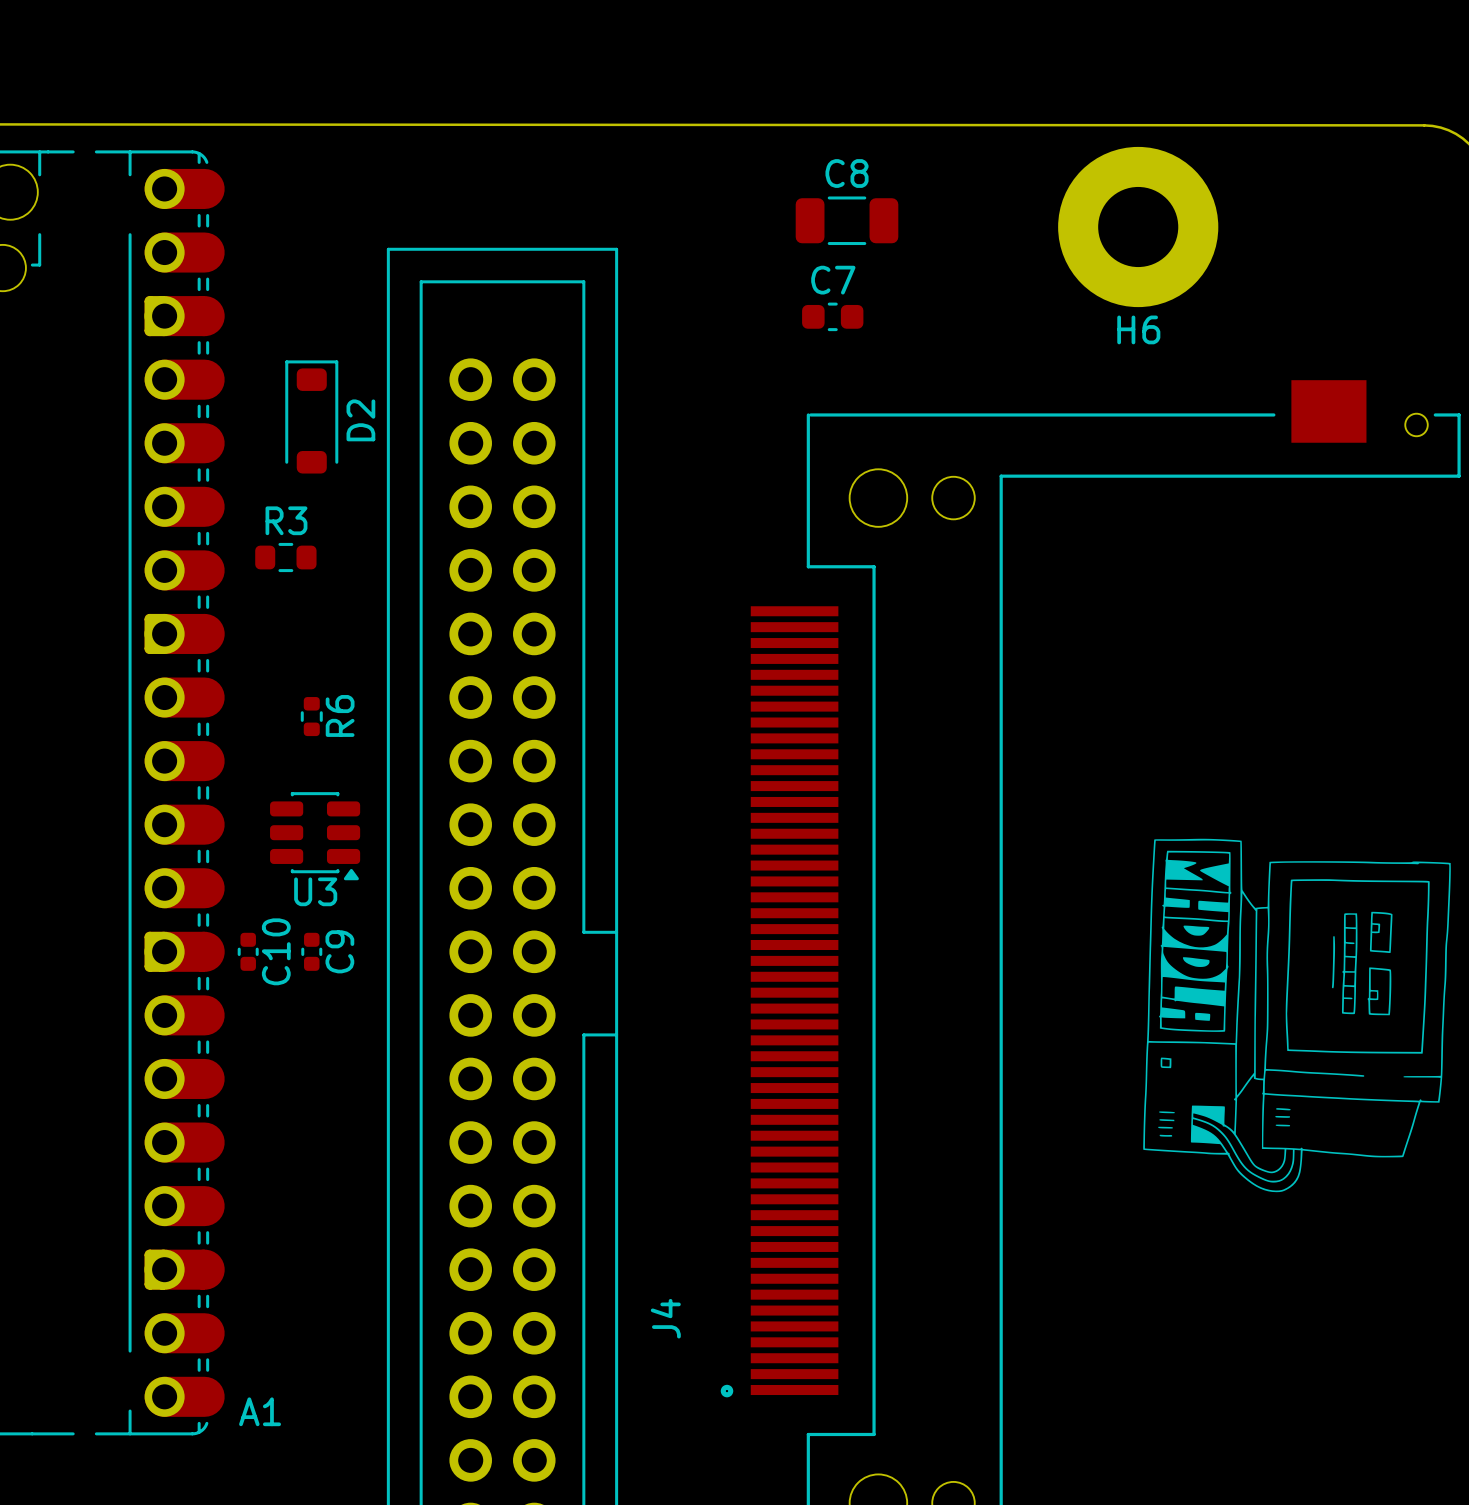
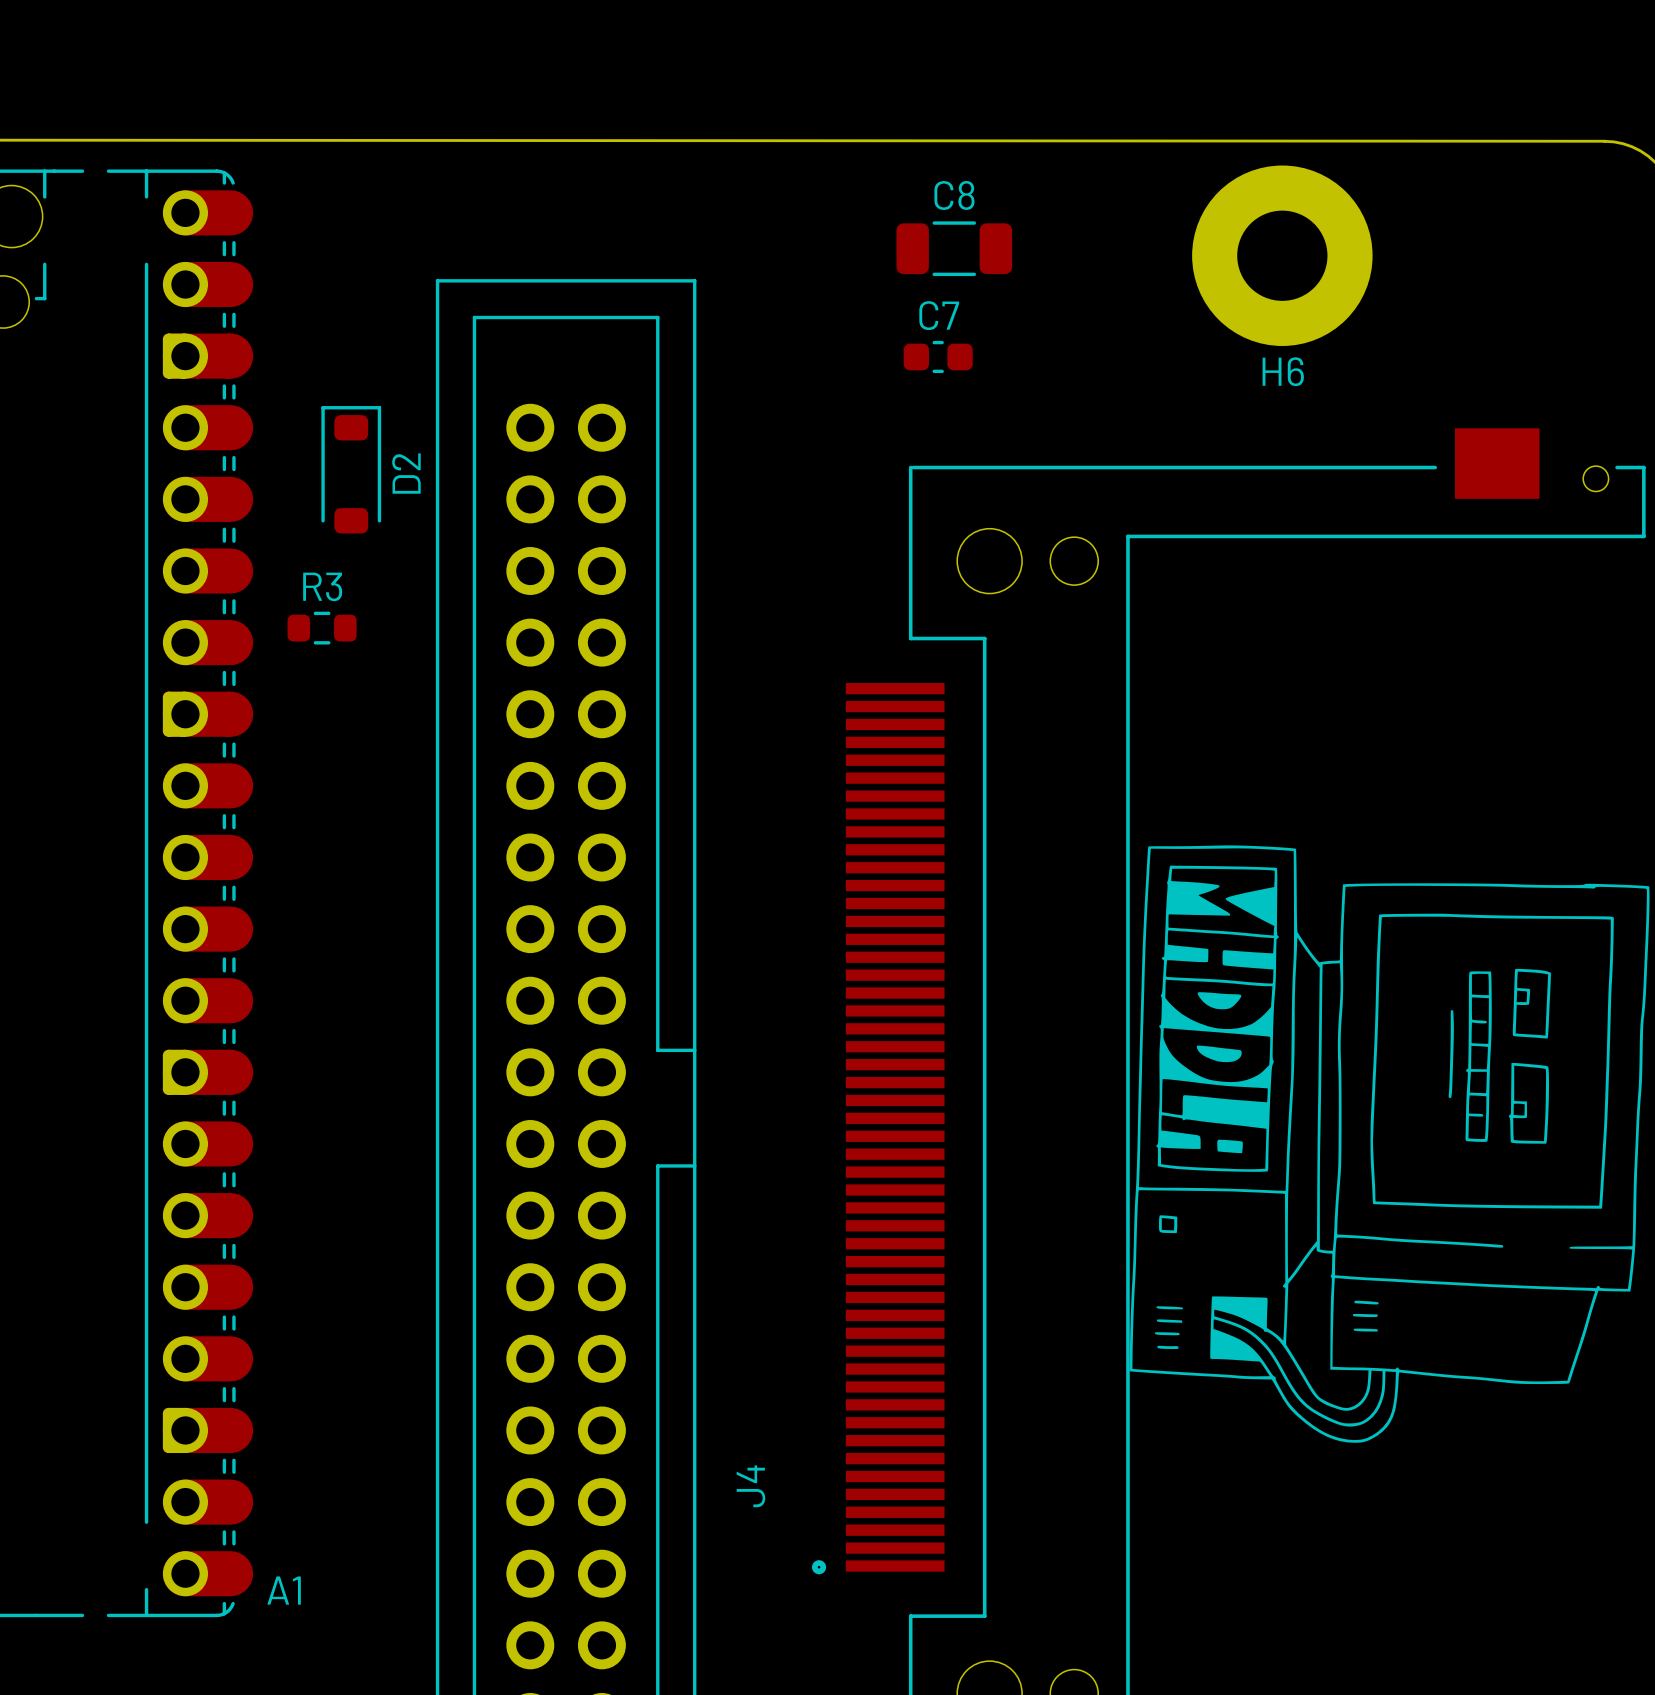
R6: (311, 716) -> none
drawing: none -> [1129, 845, 1650, 1443]
U3: (315, 836) -> none
drawing: [1143, 838, 1451, 1193] -> none
C10: (248, 951) -> none
C9: (311, 951) -> none

